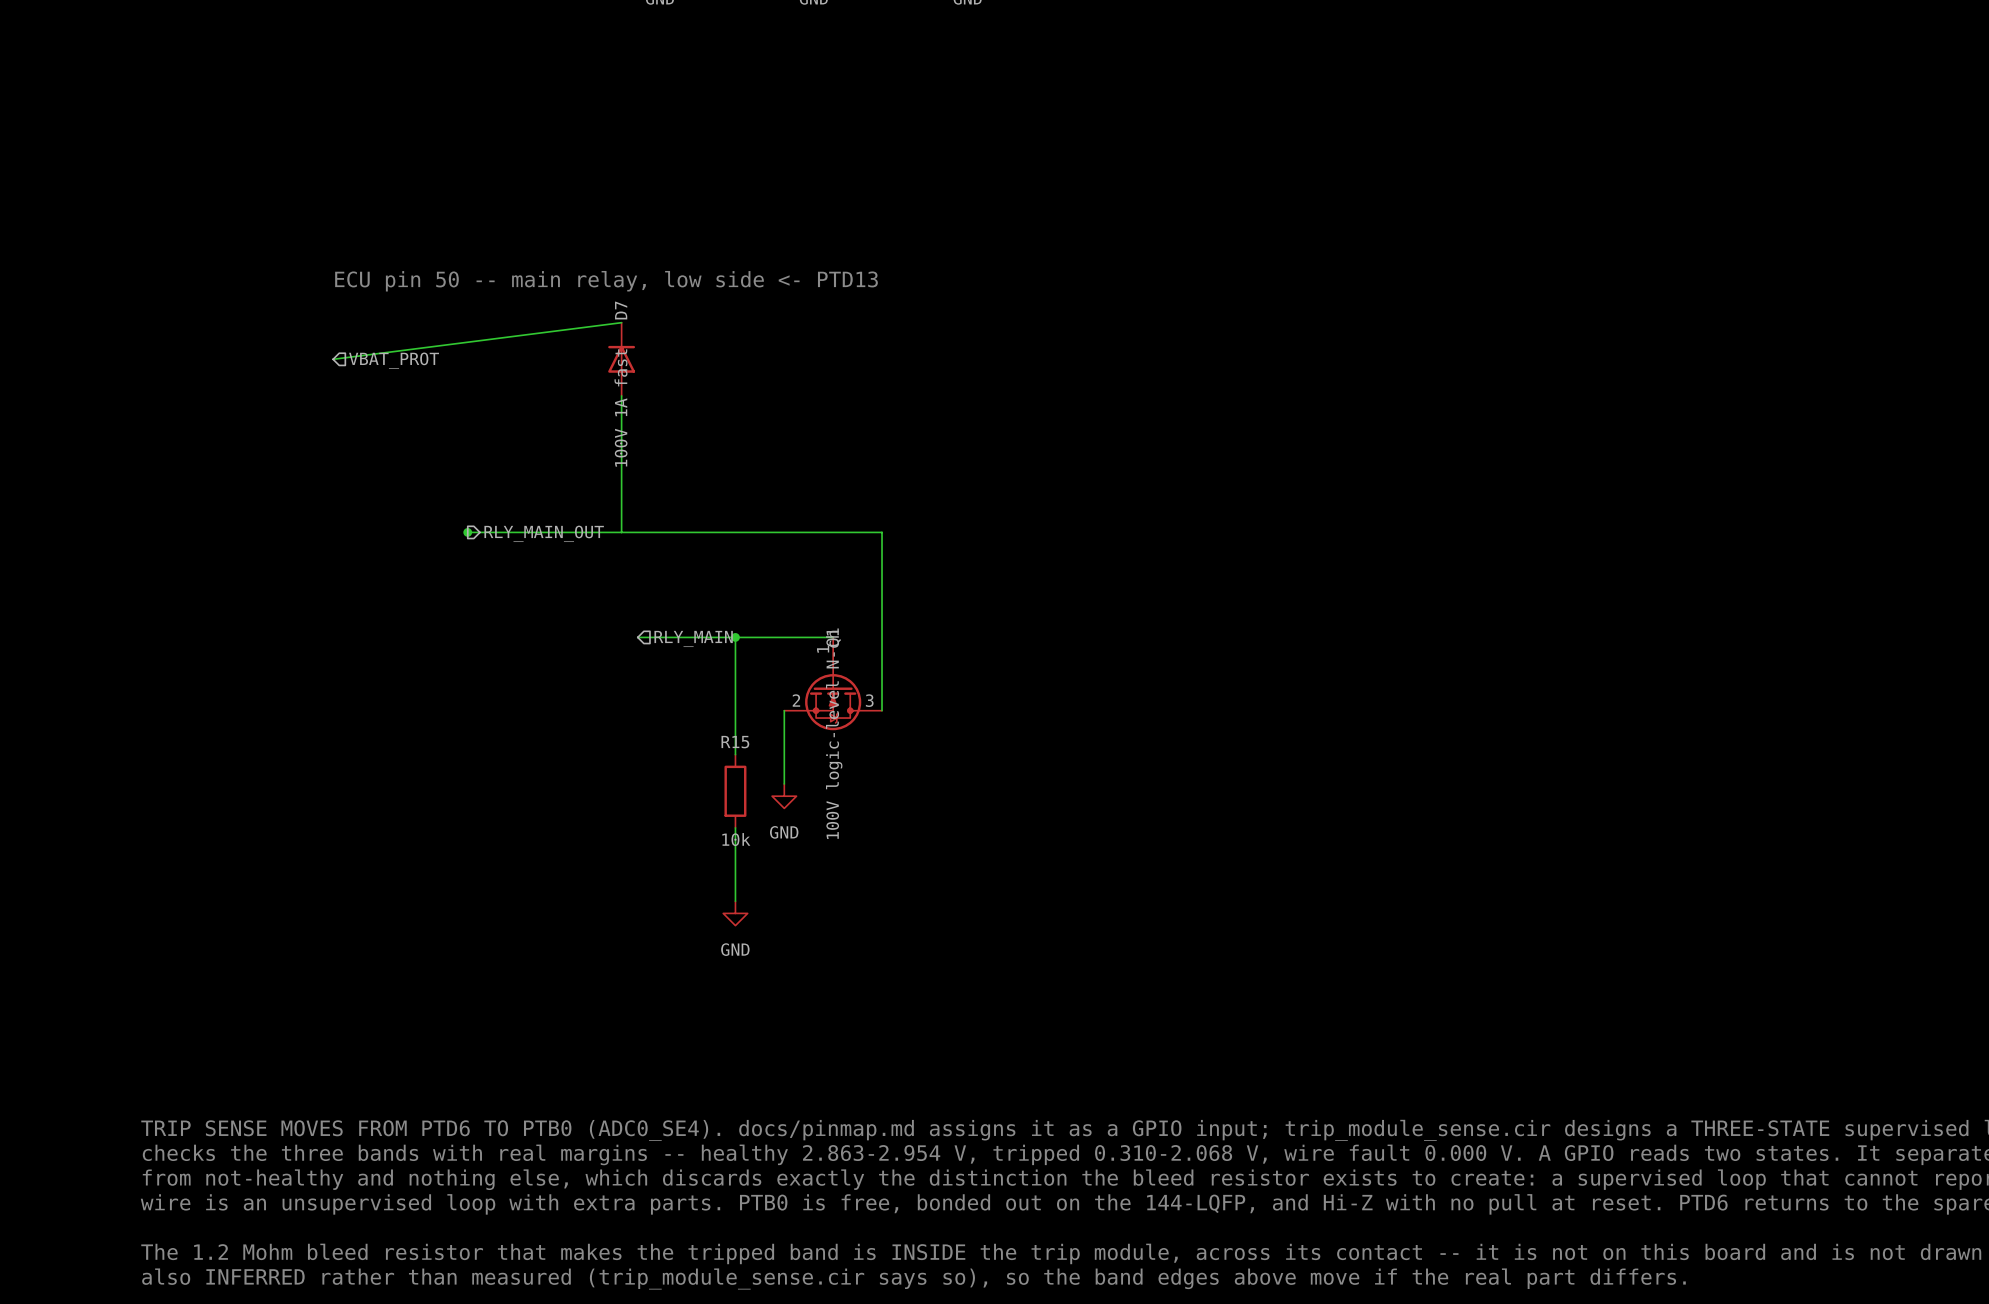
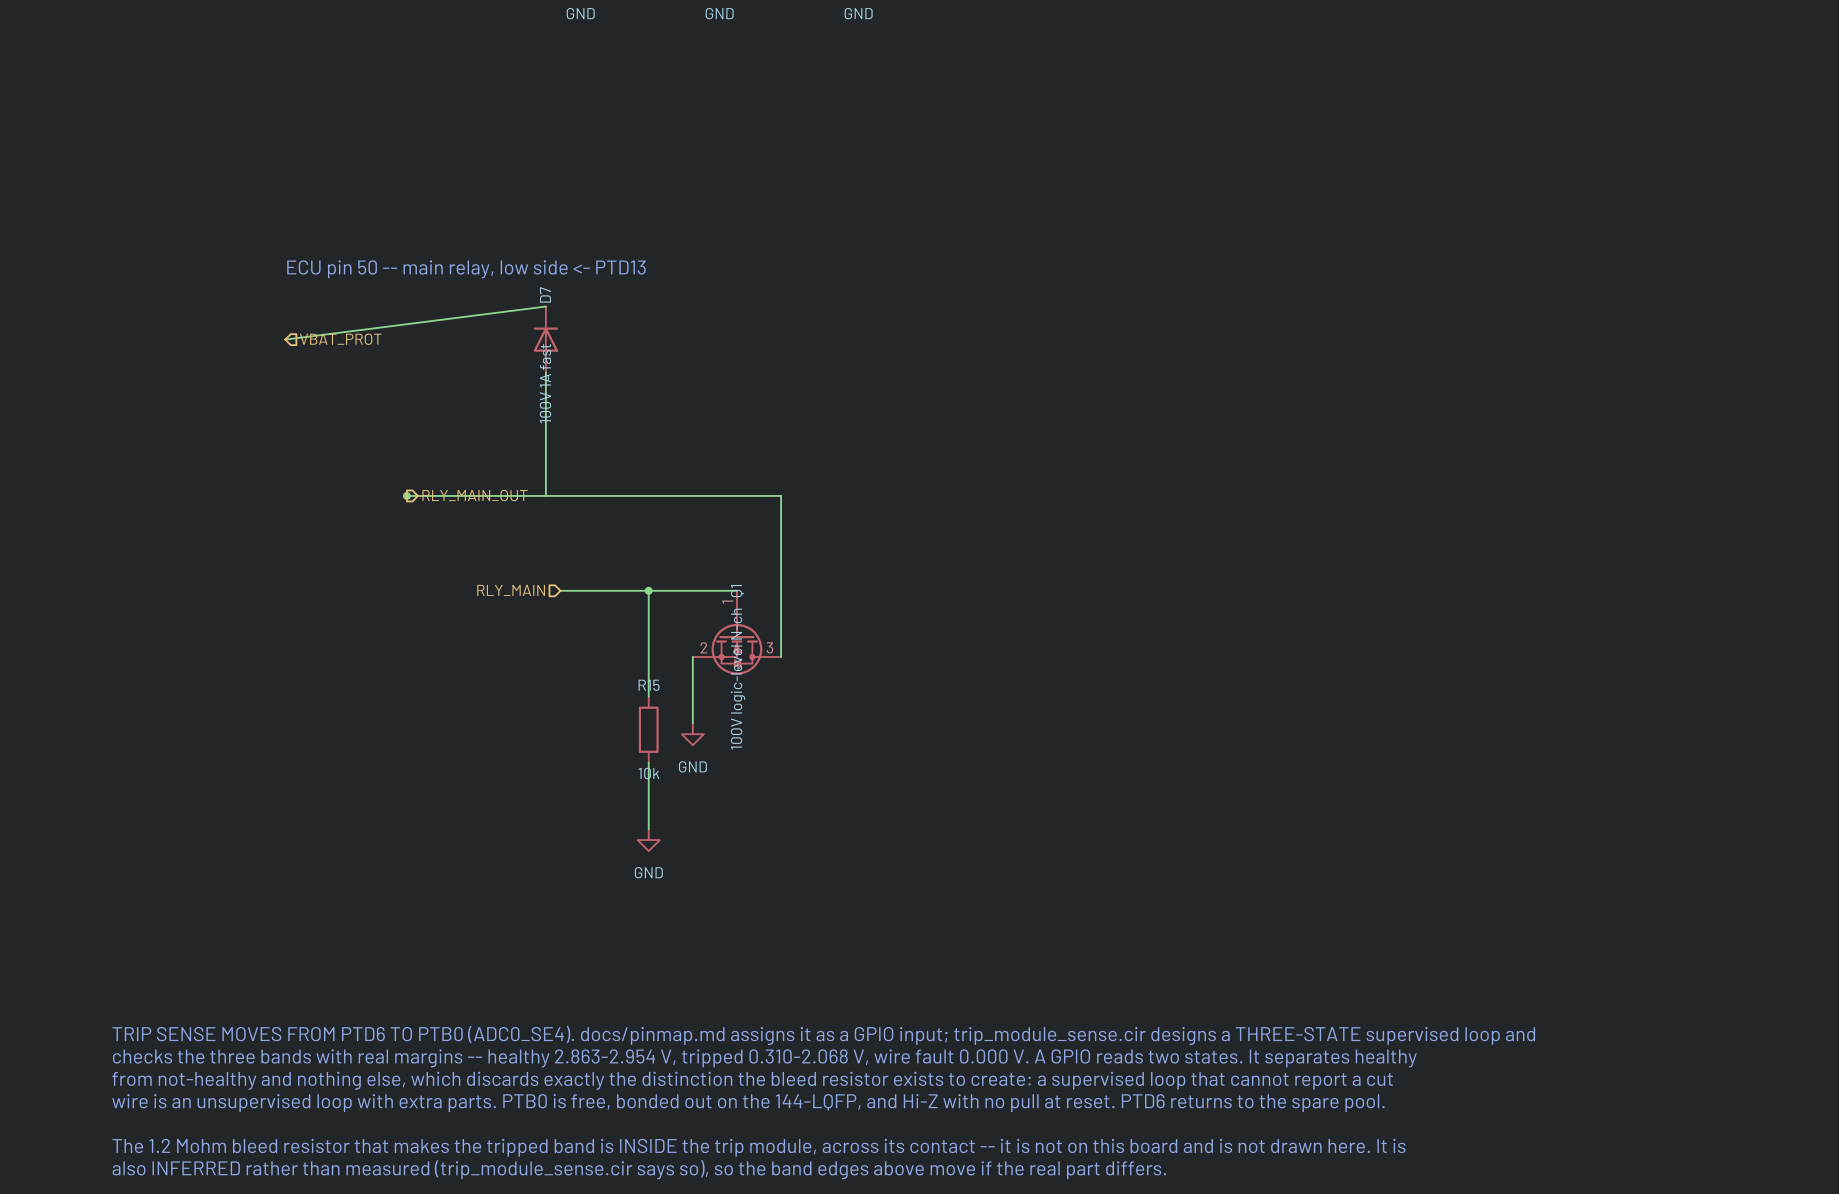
hierarchical label rotation: 0° (693, 638) -> 180° (511, 590)
hierarchical label position: RLY_MAIN (693, 638) -> RLY_MAIN (511, 590)

